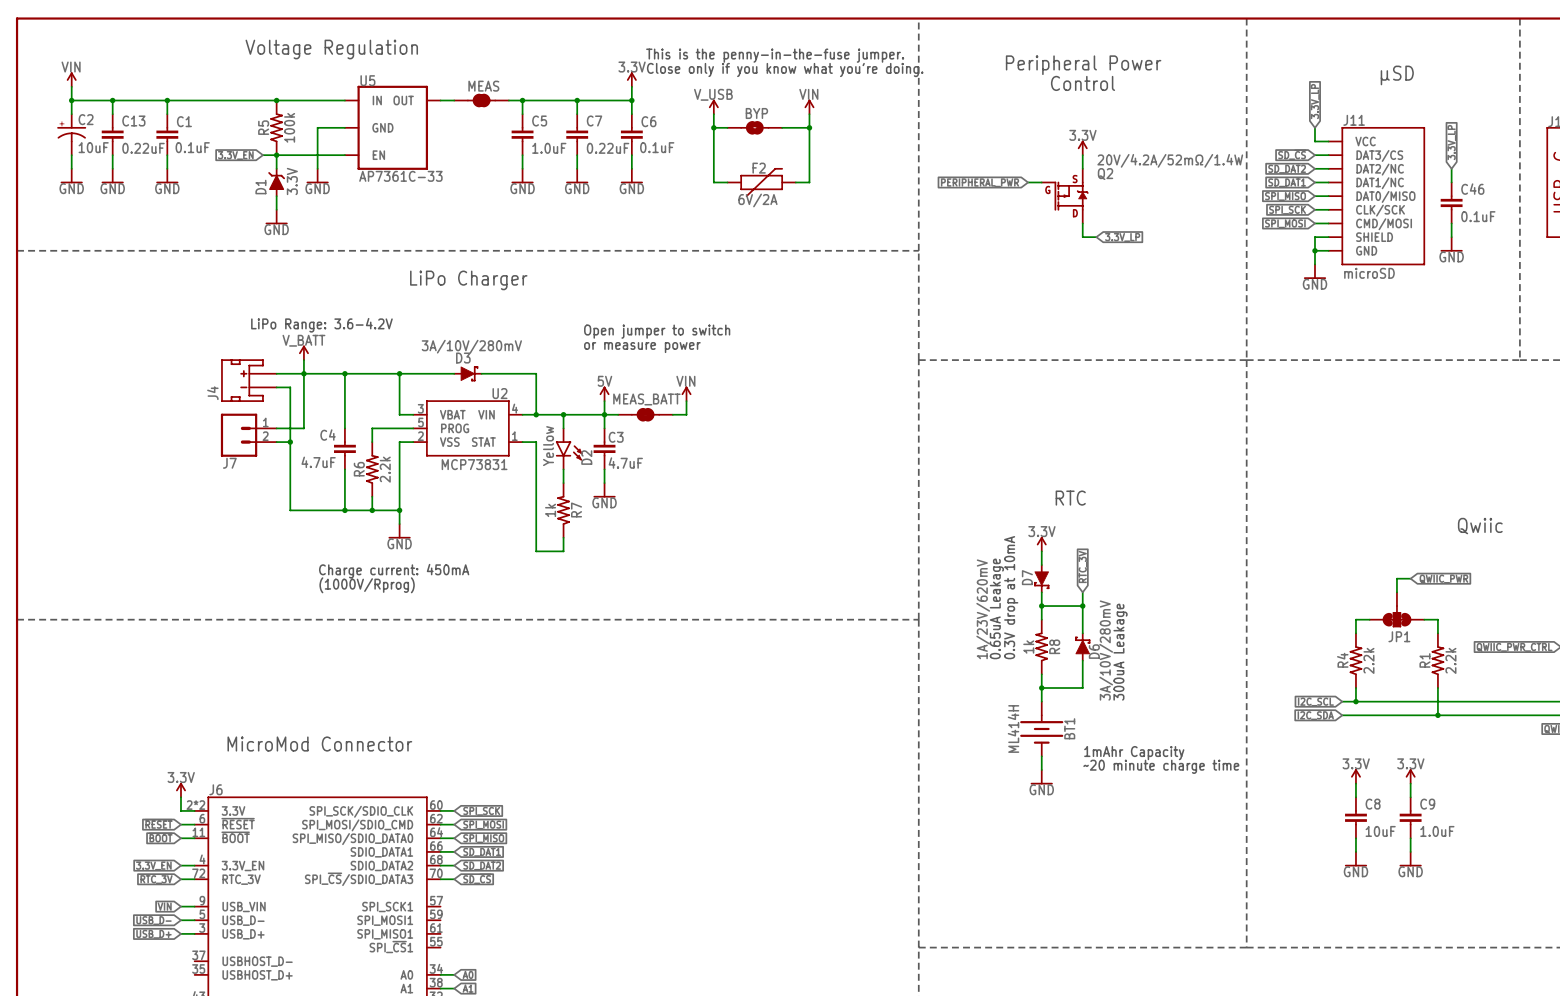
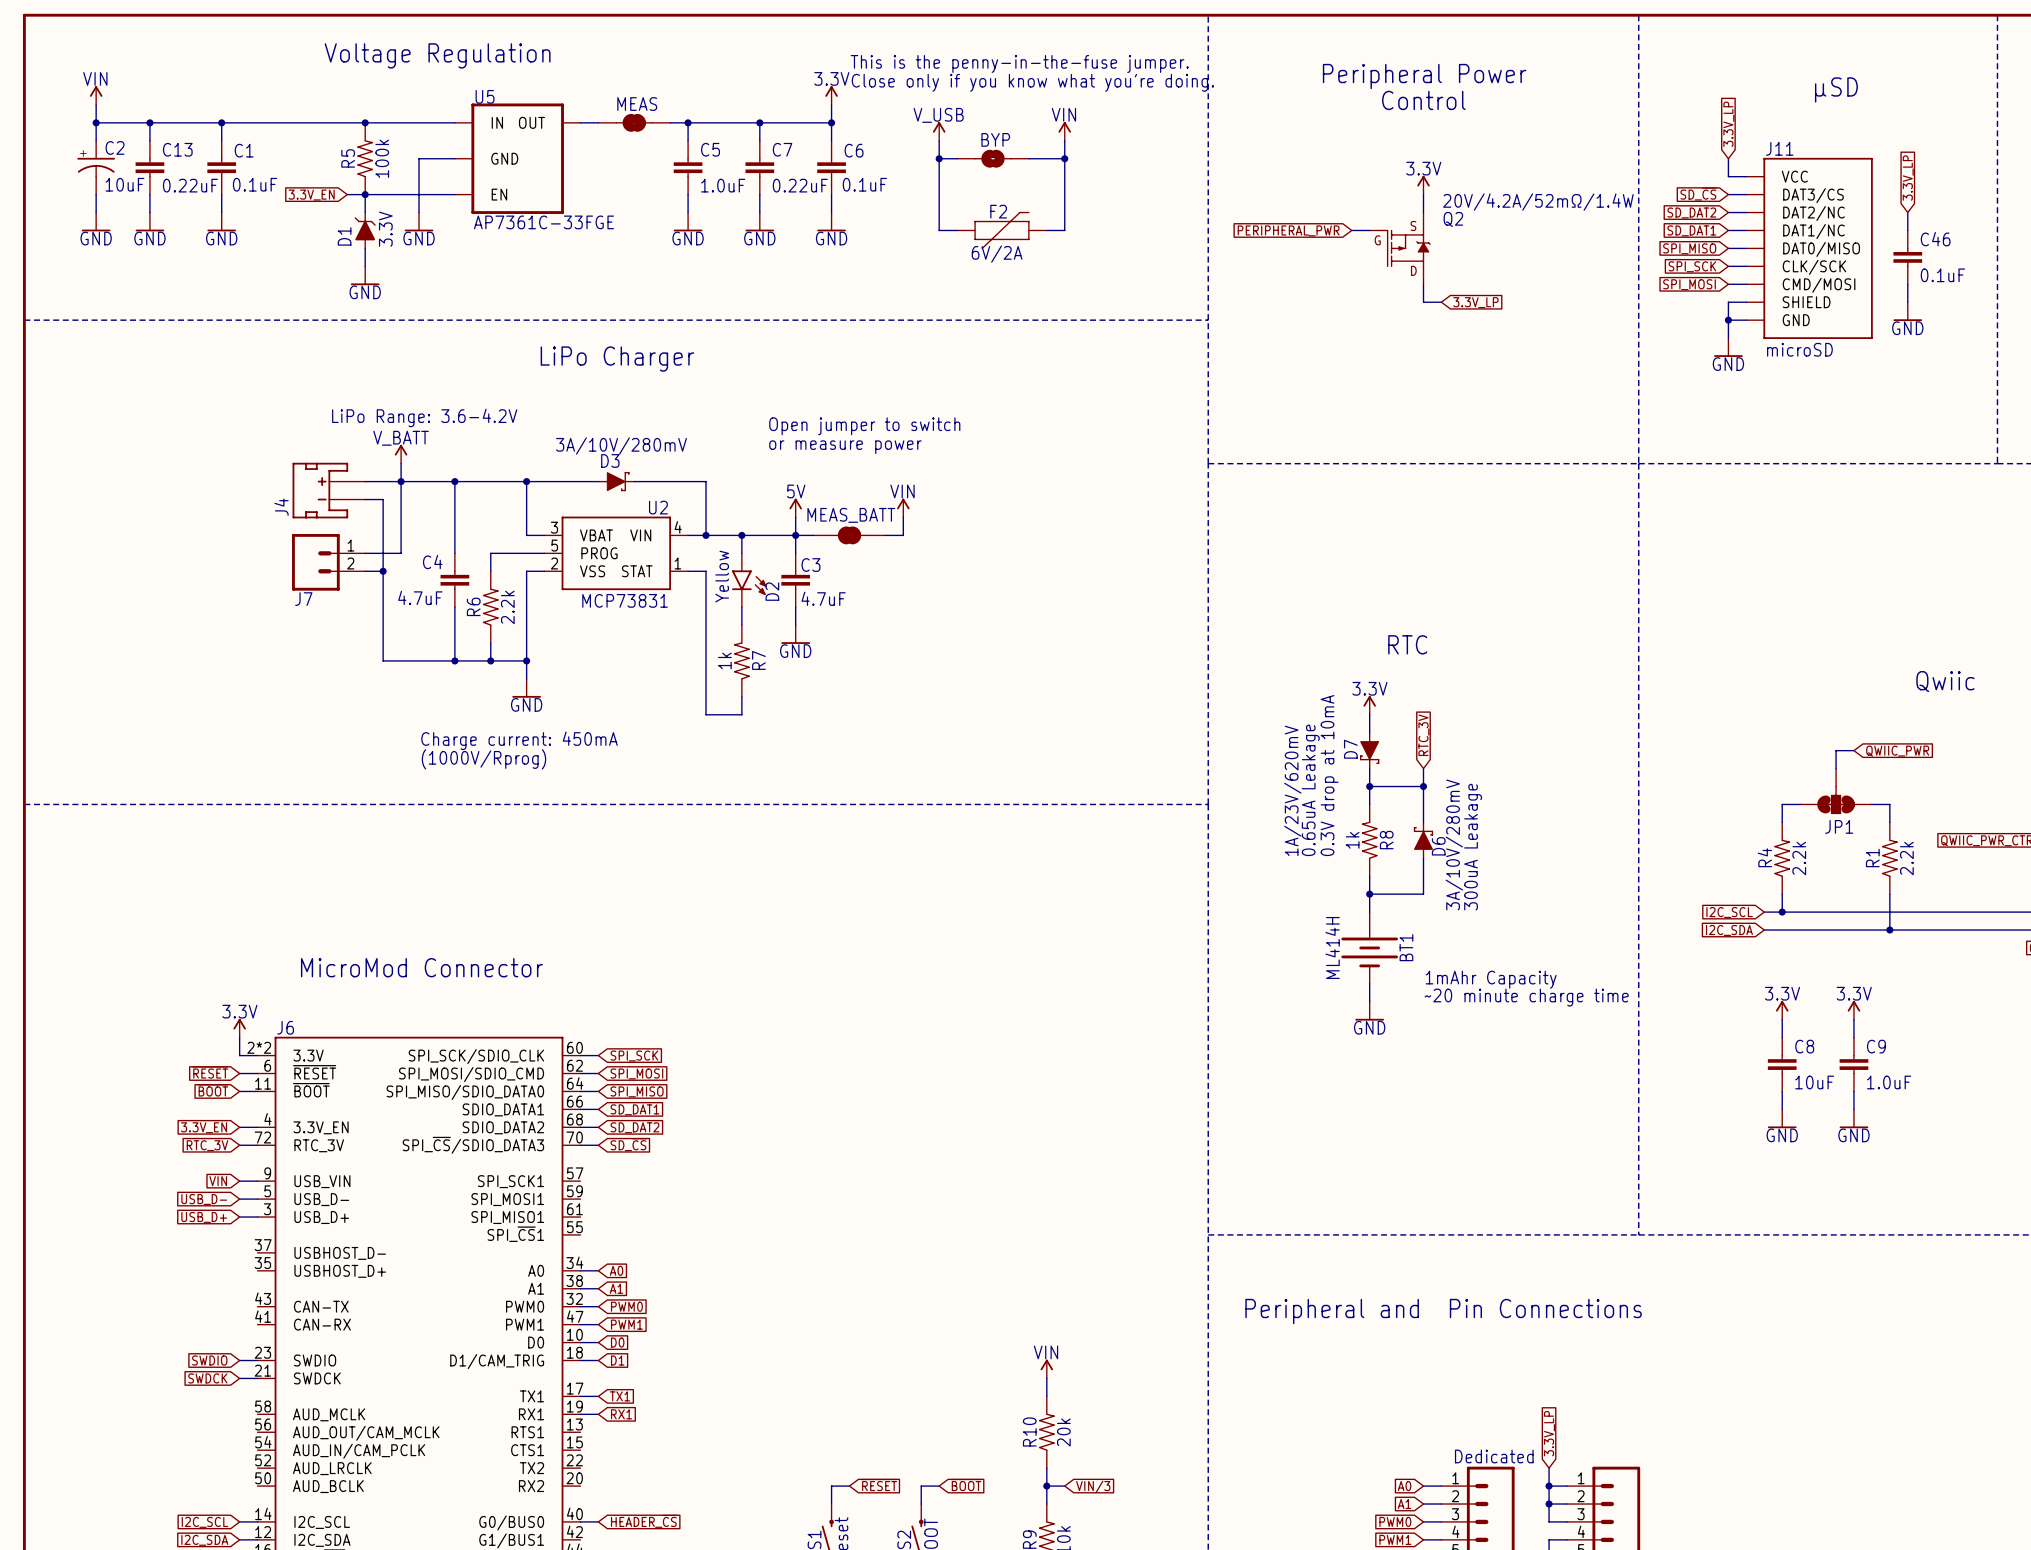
U5 value: AP7361C-33 (400, 176) -> AP7361C-33FGE (543, 222)

